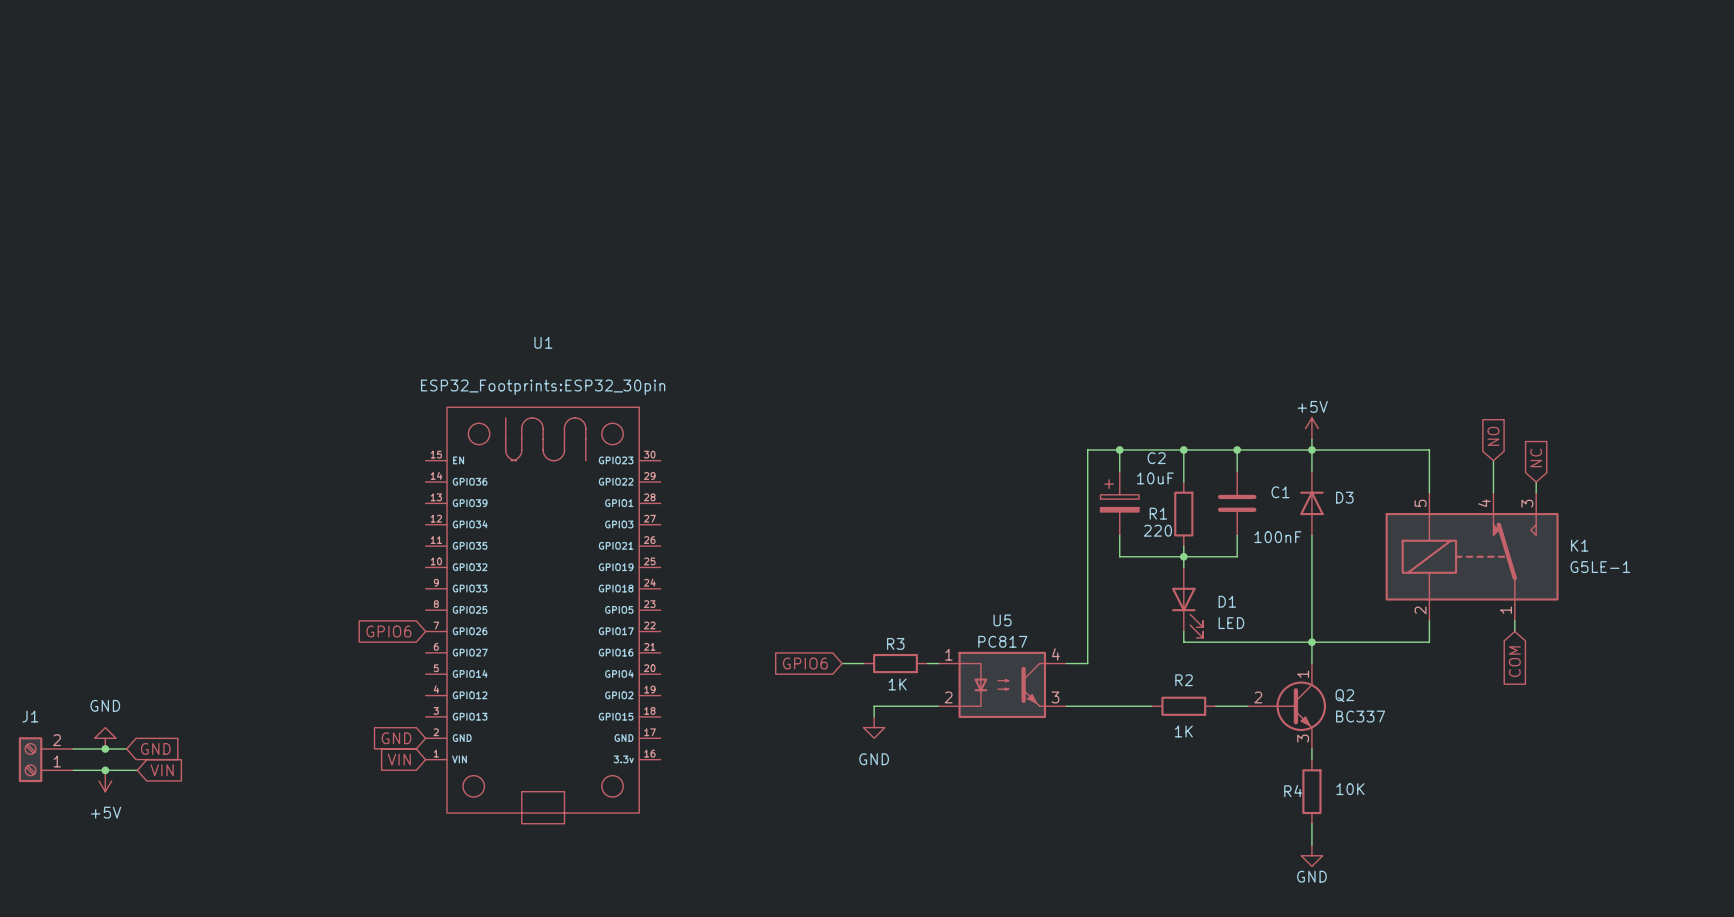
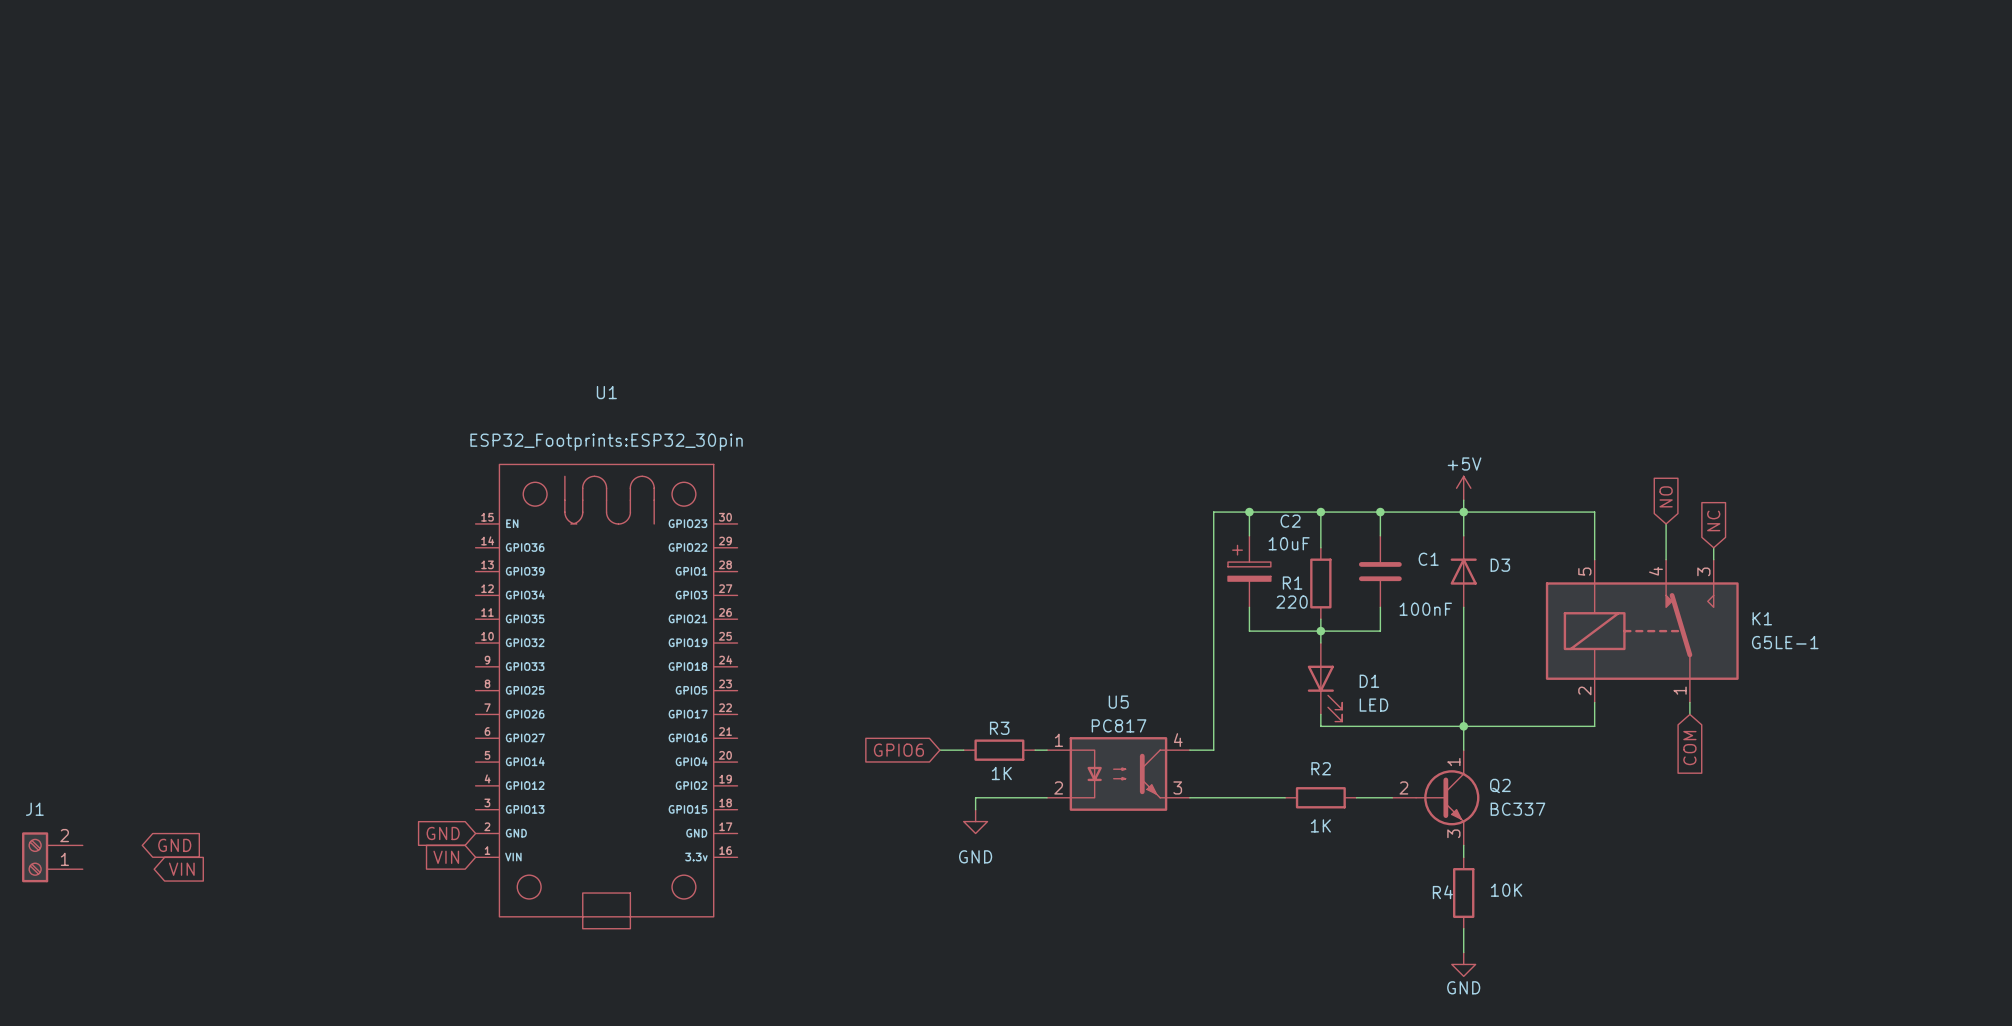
global label: GPIO6 (388, 631) -> none
power symbol: GND (105, 738) -> none
wire: (73, 748) (126, 748) -> none
junction: (105, 748) -> none
wire: (73, 770) (137, 770) -> none
junction: (105, 770) -> none
power symbol: +5V (105, 781) -> none

